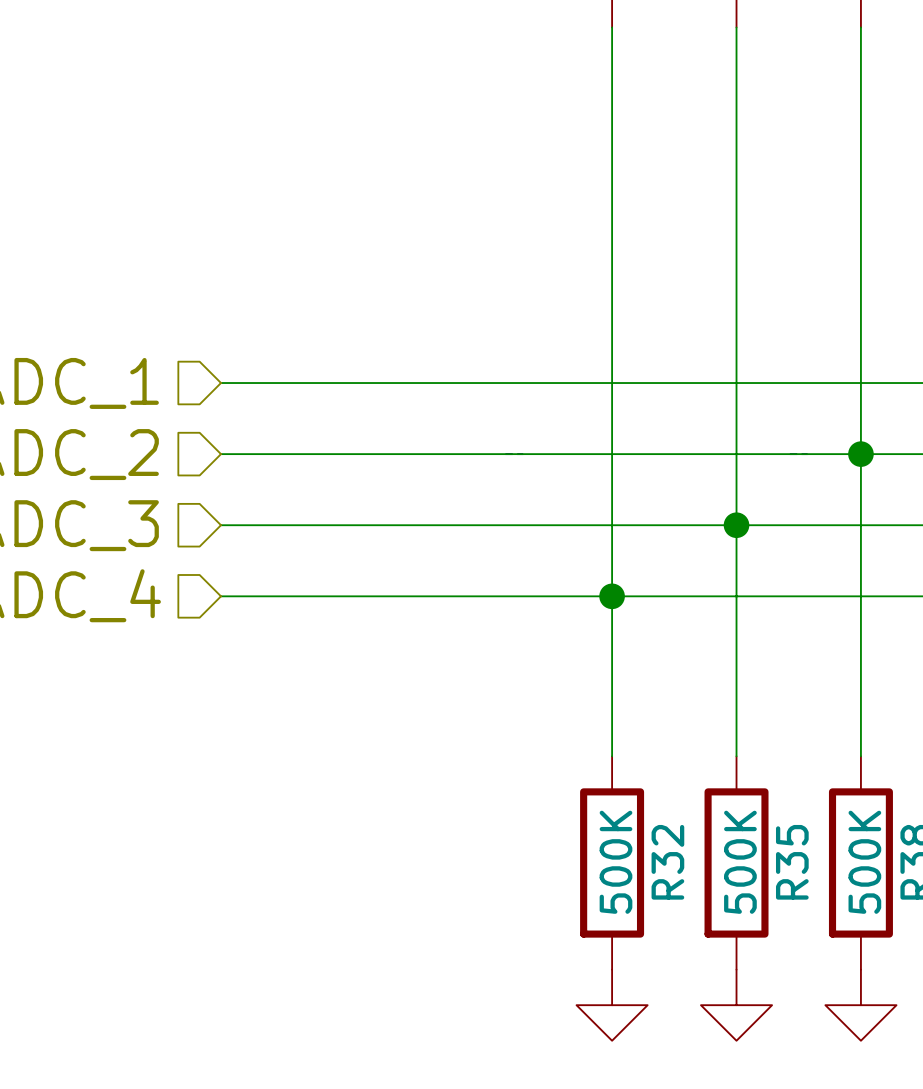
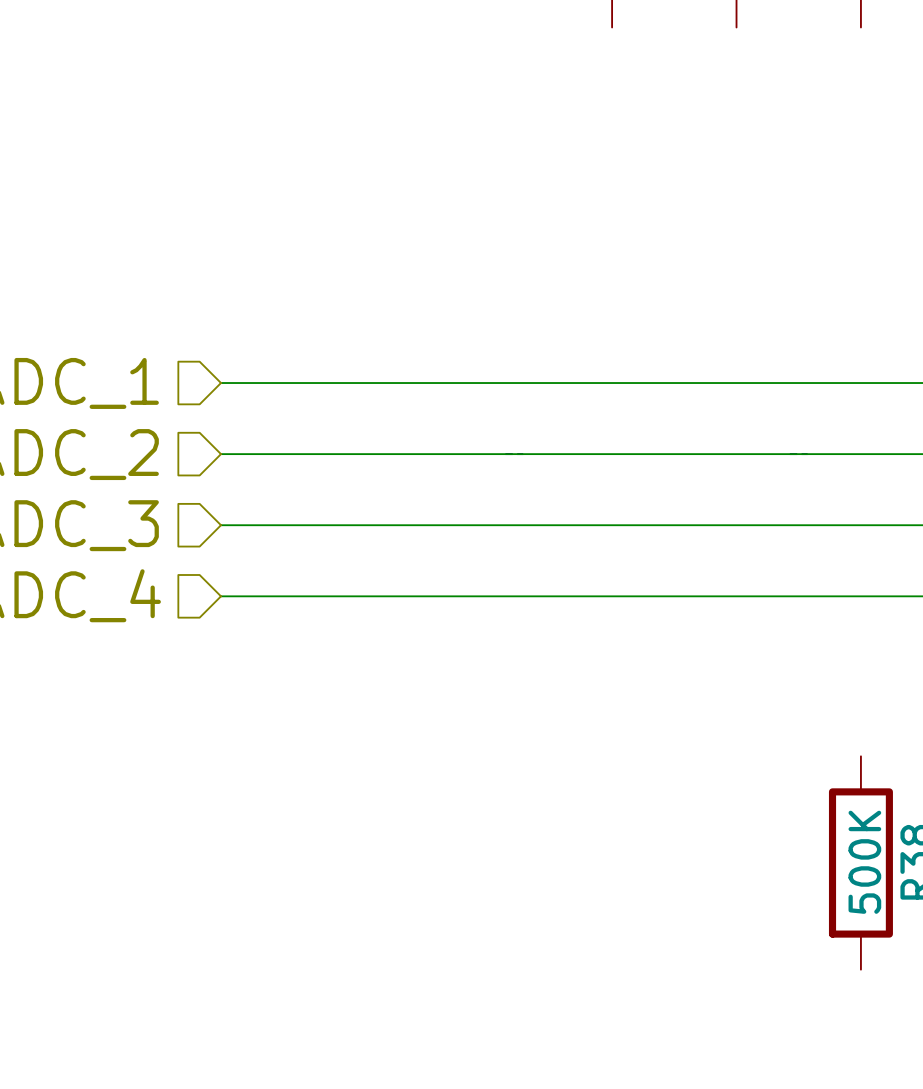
wire: (612, 27) (612, 756) -> none
wire: (736, 27) (736, 756) -> none
wire: (860, 27) (860, 756) -> none
junction: (860, 454) -> none
junction: (736, 525) -> none
junction: (612, 596) -> none
R32: 500K (612, 862) -> none
R35: 500K (736, 862) -> none
power symbol: (612, 1005) -> none
power symbol: (736, 1005) -> none
power symbol: (860, 1005) -> none

